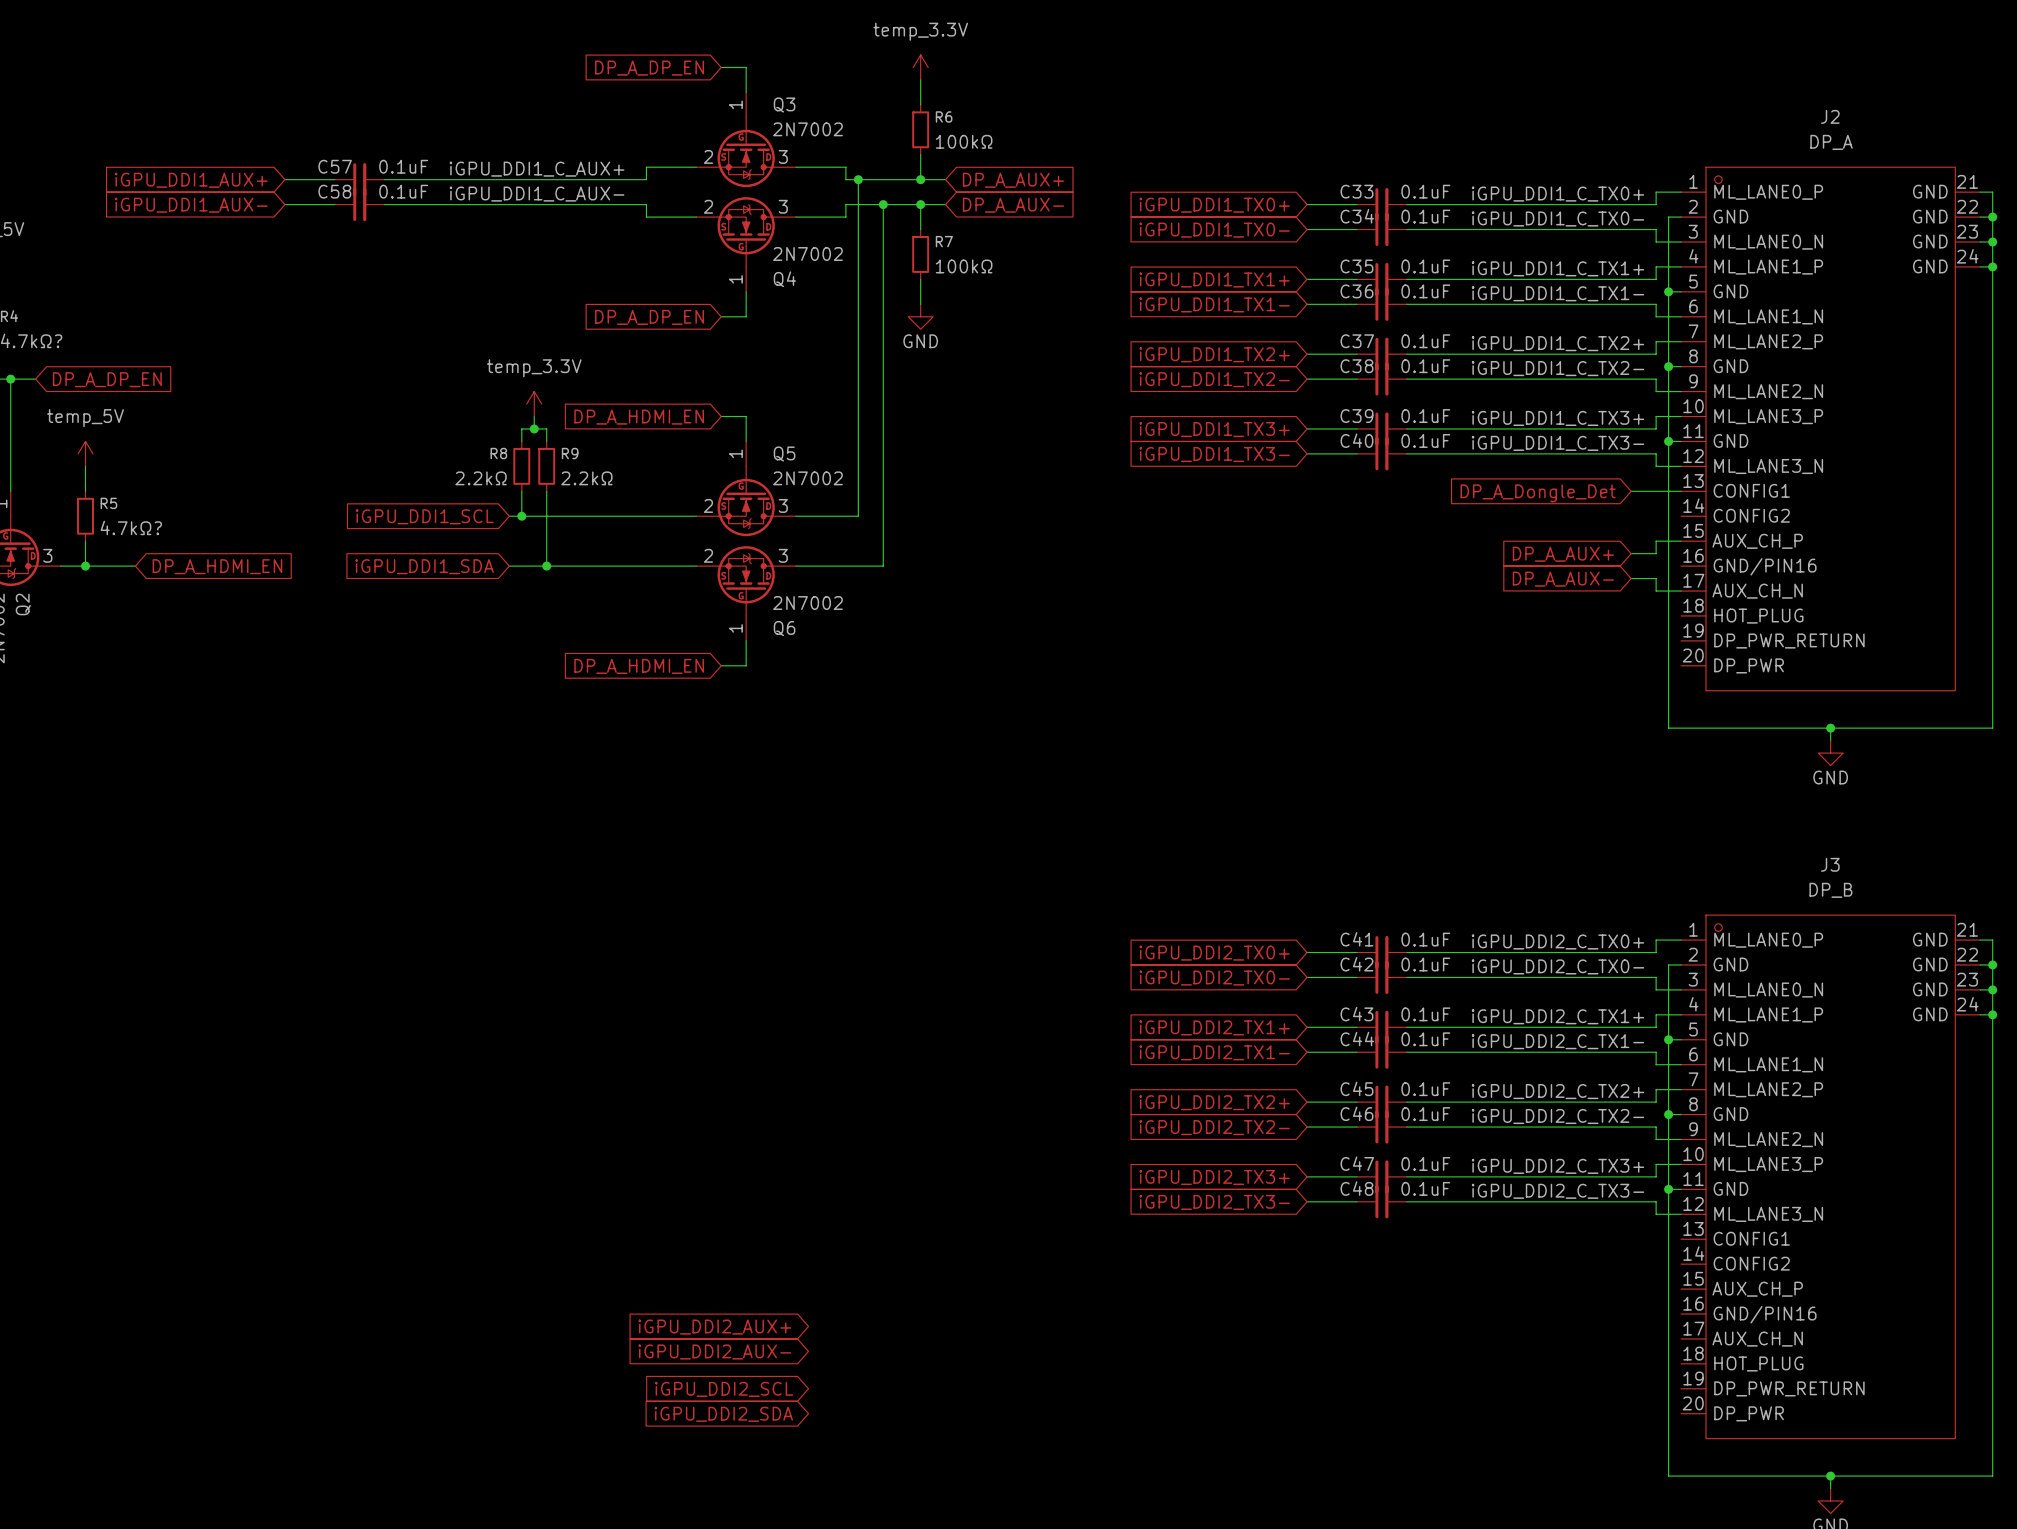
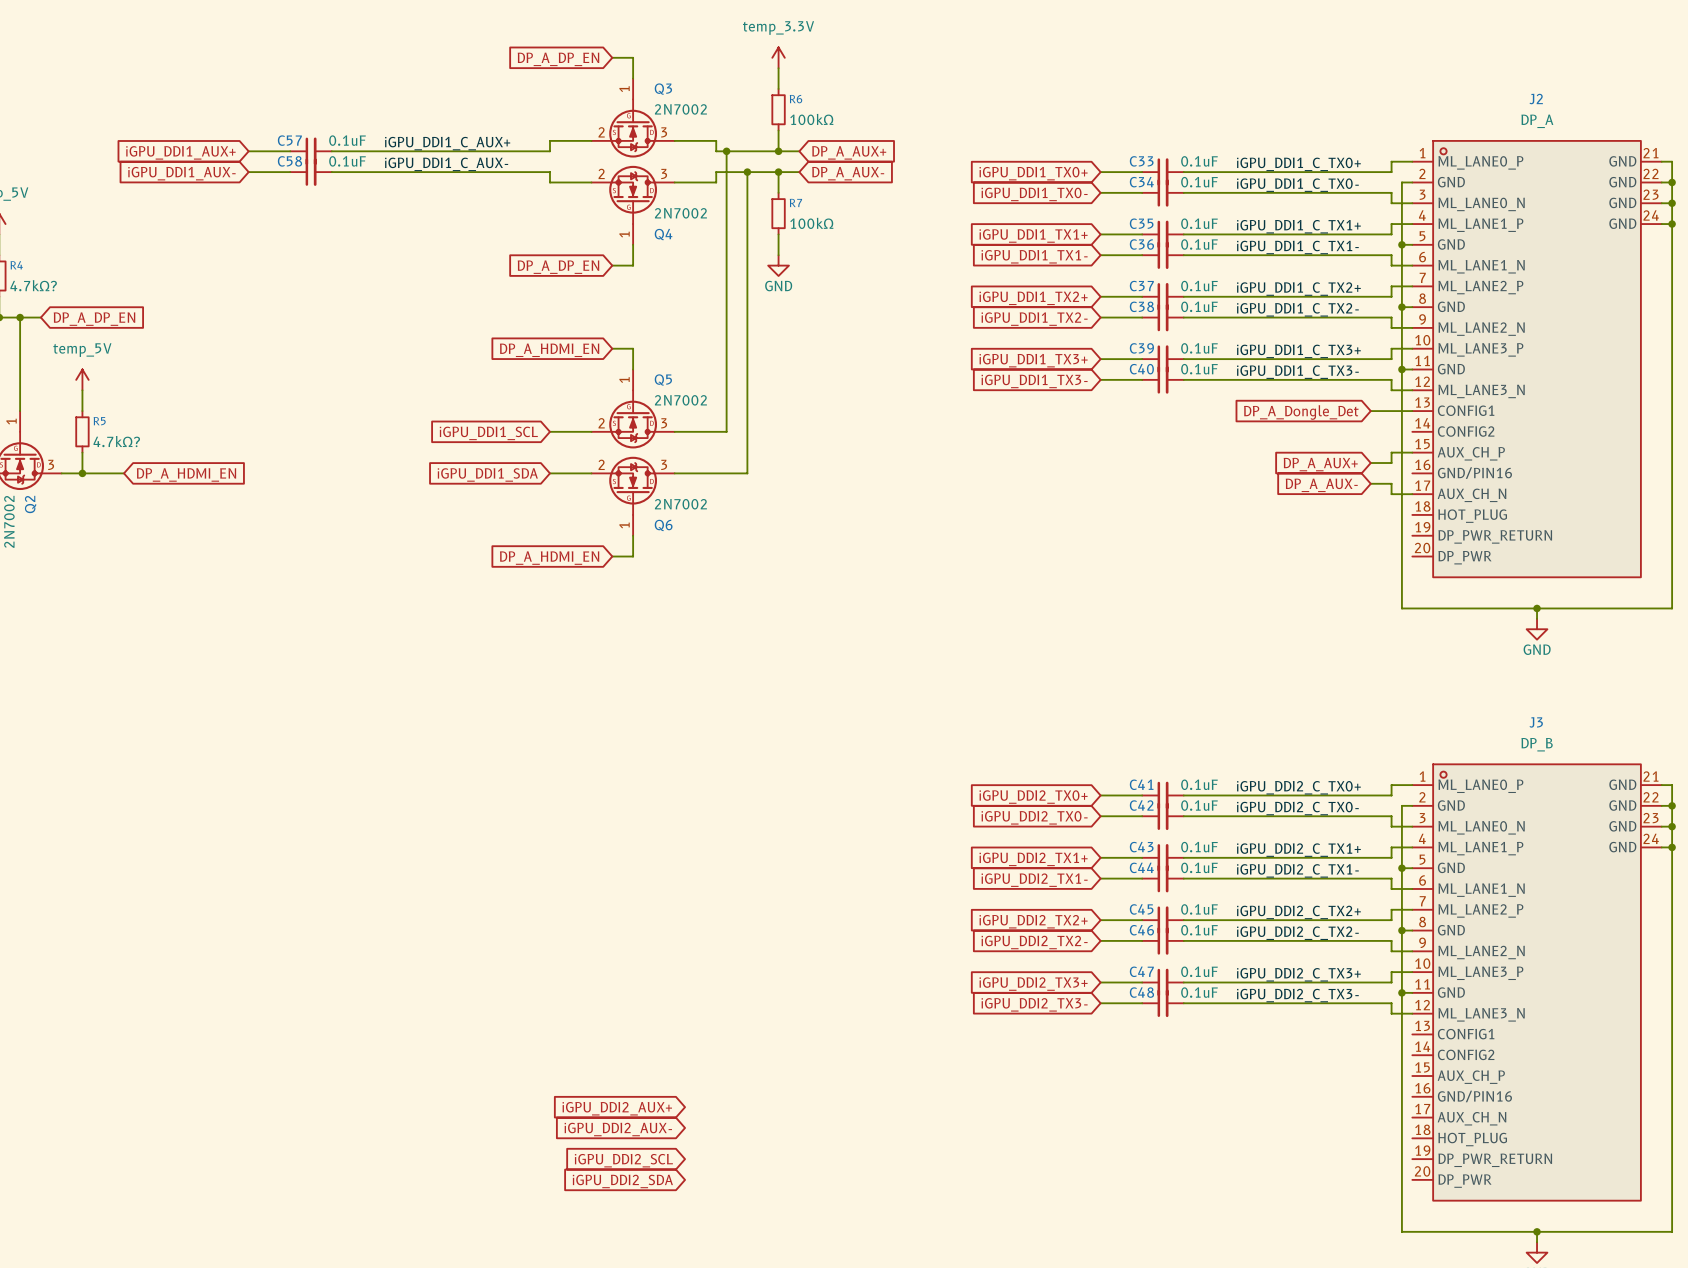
power symbol: temp_3.3V (534, 404) -> none
wire: (534, 416) (534, 428) -> none
junction: (534, 428) -> none
wire: (521, 441) (521, 428) (546, 428) (546, 441) -> none
R8: 2.2kΩ (521, 466) -> none
R9: 2.2kΩ (546, 466) -> none
wire: (521, 491) (521, 516) -> none
wire: (546, 491) (546, 566) -> none
global label position: iGPU_DDI1_SCL (424, 516) -> iGPU_DDI1_SCL (488, 433)
wire: (509, 516) (646, 516) -> none
junction: (521, 516) -> none
global label position: iGPU_DDI1_SDA (424, 566) -> iGPU_DDI1_SDA (487, 474)
wire: (509, 566) (646, 566) -> none
junction: (546, 566) -> none

